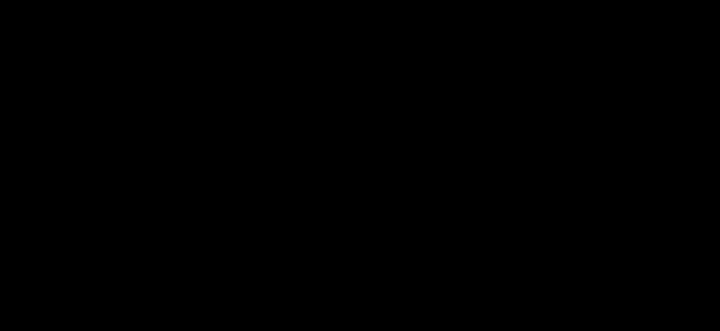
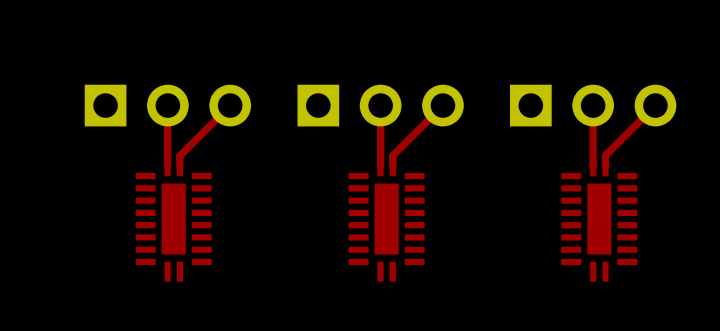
top track: none -> (167, 105) (167, 166)
part: none -> (167, 105)
top track: none -> (230, 105) (179, 155) (179, 166)
top track: none -> (380, 105) (380, 166)
part: none -> (380, 105)
top track: none -> (442, 105) (392, 155) (392, 166)
top track: none -> (593, 105) (593, 166)
part: none -> (593, 105)
top track: none -> (655, 105) (605, 155) (605, 166)
part: none -> (173, 218)
part: none -> (386, 219)
part: none -> (599, 219)

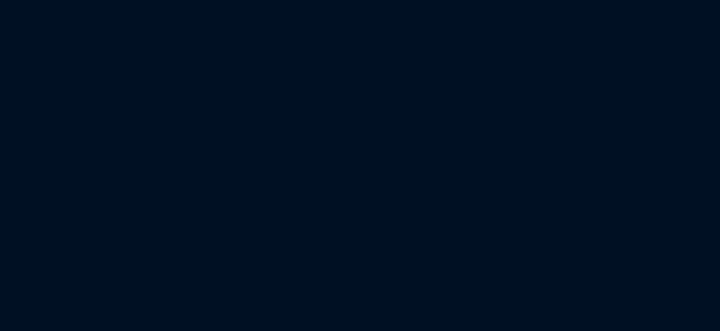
top track: (167, 105) (167, 166) -> none
part: (167, 105) -> none
top track: (230, 105) (179, 155) (179, 166) -> none
top track: (380, 105) (380, 166) -> none
part: (380, 105) -> none
top track: (442, 105) (392, 155) (392, 166) -> none
top track: (593, 105) (593, 166) -> none
part: (593, 105) -> none
top track: (655, 105) (605, 155) (605, 166) -> none
part: (173, 218) -> none
part: (386, 219) -> none
part: (599, 219) -> none

